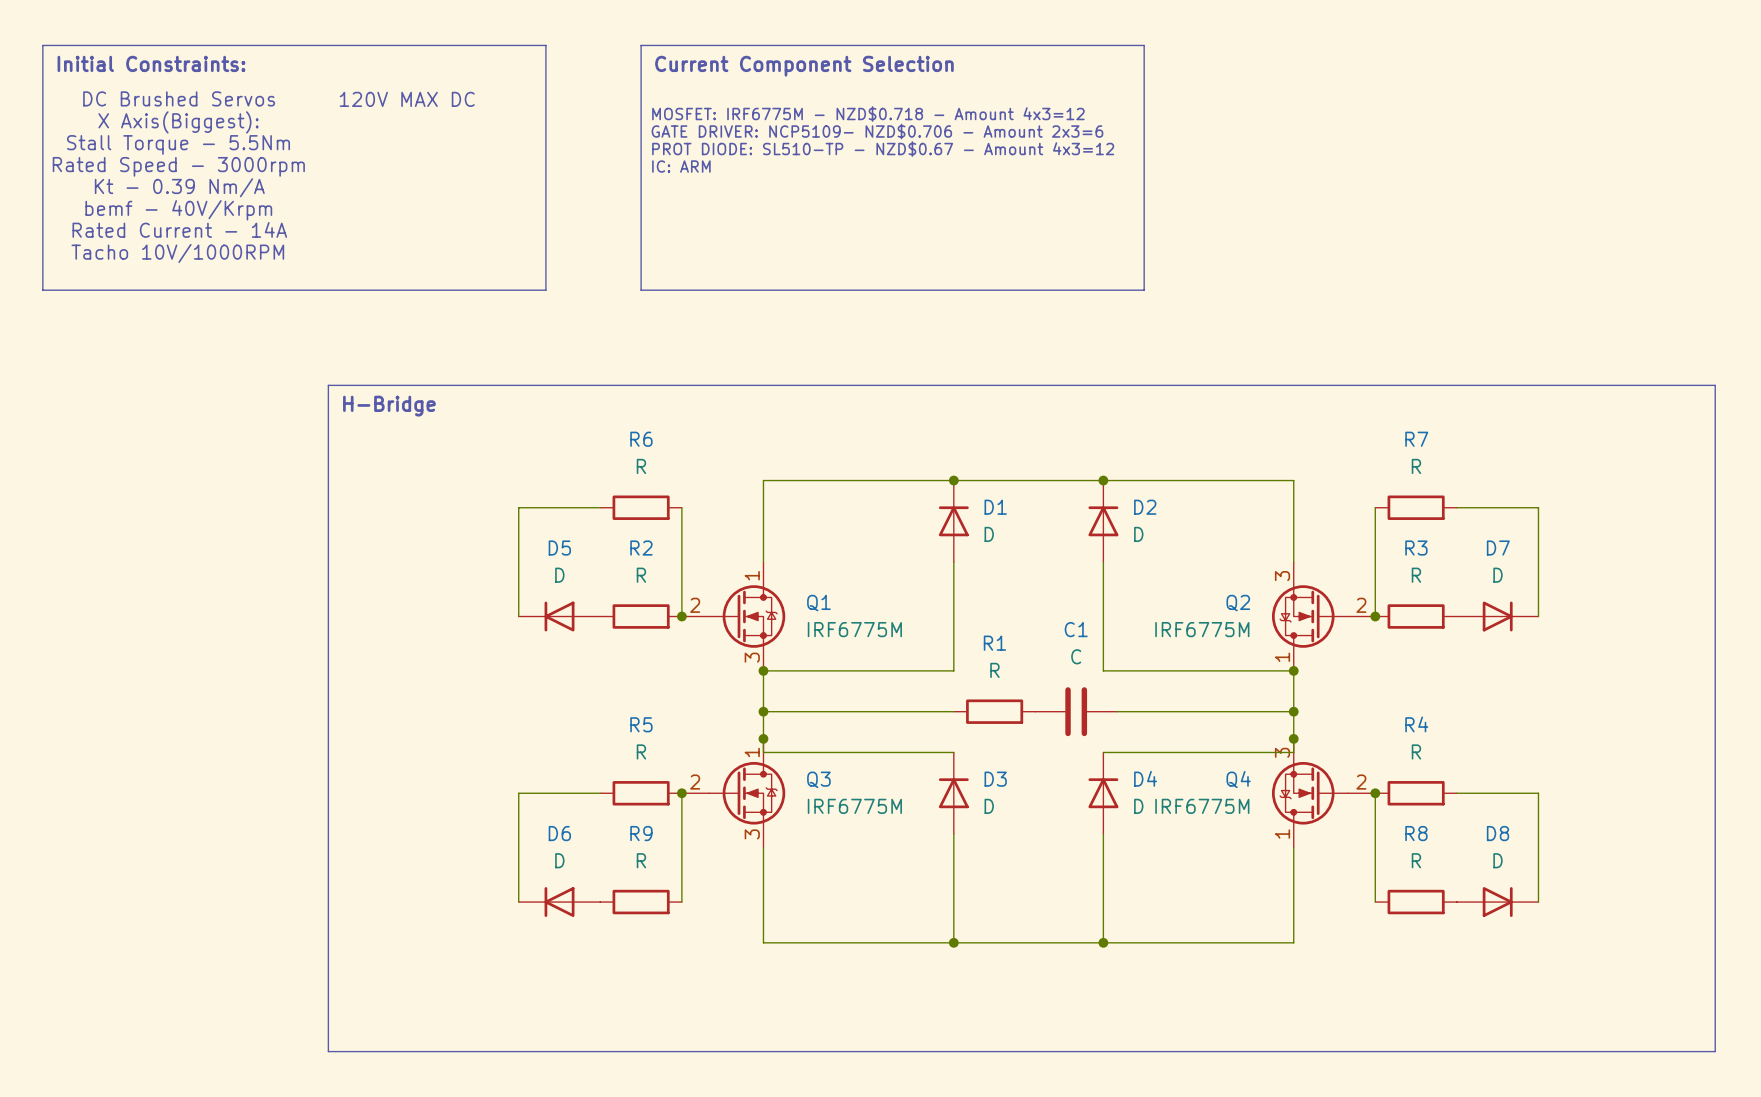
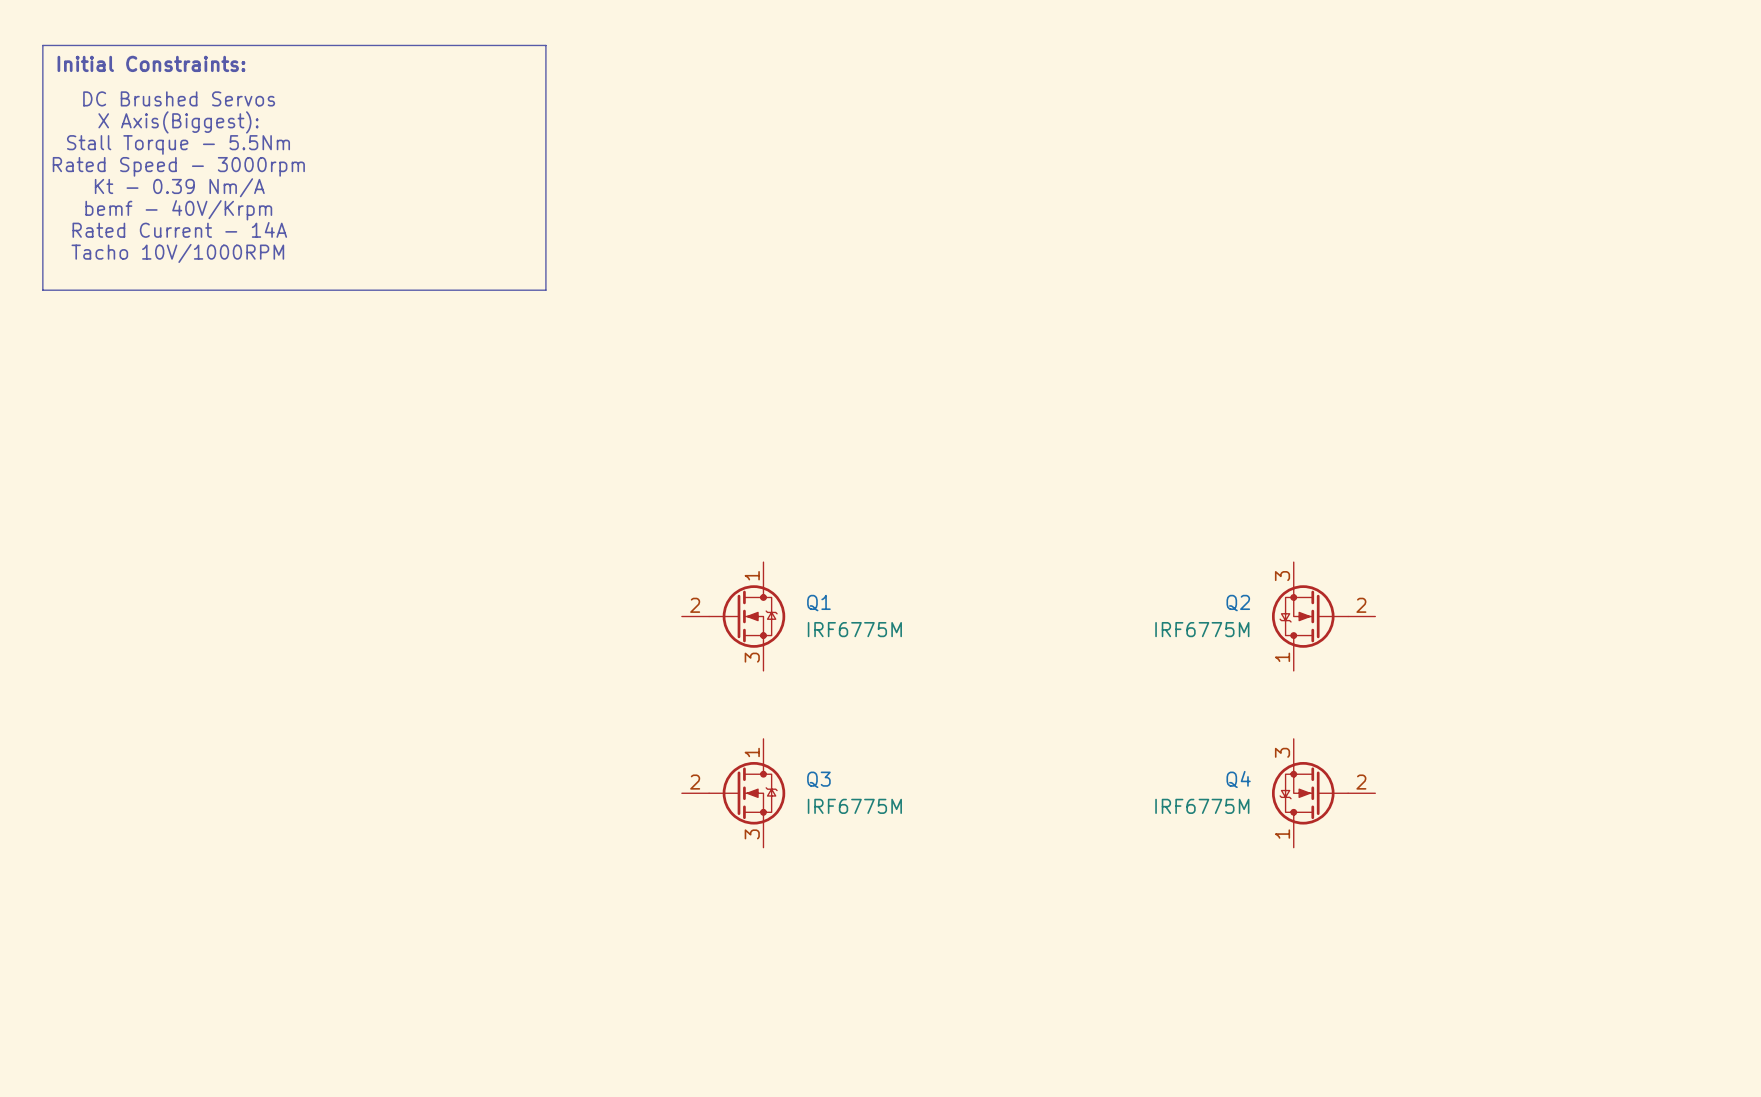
line: (641, 45) (1144, 45) (1144, 290) (641, 290) (641, 45) -> none
text: Current Component Selection (804, 66) -> none
text: 120V MAX DC (407, 99) -> none
text: MOSFET: IRF6775M - NZD$0.718 - Amount 4x3=12 (868, 114) -> none
text: GATE DRIVER: NCP5109- NZD$0.706 - Amount 2x3=6 (877, 131) -> none
text: PROT DIODE: SL510-TP - NZD$0.67 - Amount 4x3=12 (883, 149) -> none
text: IC: ARM (681, 166) -> none
line: (328, 385) (1715, 385) (1715, 1051) (328, 1051) (328, 385) -> none
text: H-Bridge (389, 406) -> none
junction: (953, 480) -> none
junction: (1103, 480) -> none
wire: (600, 507) (518, 507) (518, 616) -> none
R6: R (641, 507) -> none
wire: (681, 507) (681, 616) -> none
wire: (1375, 507) (1375, 616) -> none
R7: R (1416, 507) -> none
wire: (1456, 507) (1538, 507) (1538, 616) -> none
D1: D (953, 521) -> none
D2: D (1103, 521) -> none
wire: (763, 562) (763, 480) (1293, 480) (1293, 562) -> none
wire: (953, 562) (953, 670) (763, 670) (763, 752) (953, 752) -> none
wire: (1103, 562) (1103, 670) (1293, 670) (1293, 752) (1103, 752) -> none
D5: D (559, 616) -> none
R2: R (641, 616) -> none
junction: (681, 616) -> none
junction: (1375, 616) -> none
R3: R (1416, 616) -> none
D7: D (1497, 616) -> none
junction: (763, 670) -> none
junction: (1293, 670) -> none
wire: (763, 711) (953, 711) -> none
junction: (763, 711) -> none
R1: R (994, 711) -> none
C1: C (1076, 711) -> none
wire: (1116, 711) (1293, 711) -> none
junction: (1293, 711) -> none
junction: (763, 738) -> none
junction: (1293, 738) -> none
wire: (600, 793) (518, 793) (518, 902) -> none
R5: R (641, 793) -> none
wire: (681, 793) (681, 902) -> none
junction: (681, 793) -> none
D3: D (953, 793) -> none
D4: D (1103, 793) -> none
wire: (1375, 793) (1375, 902) -> none
junction: (1375, 793) -> none
R4: R (1416, 793) -> none
wire: (1456, 793) (1538, 793) (1538, 902) -> none
wire: (953, 834) (953, 942) -> none
wire: (1103, 834) (1103, 942) -> none
wire: (763, 847) (763, 942) (1293, 942) (1293, 847) -> none
D6: D (559, 902) -> none
R9: R (641, 902) -> none
R8: R (1416, 902) -> none
D8: D (1497, 902) -> none
junction: (953, 942) -> none
junction: (1103, 942) -> none

